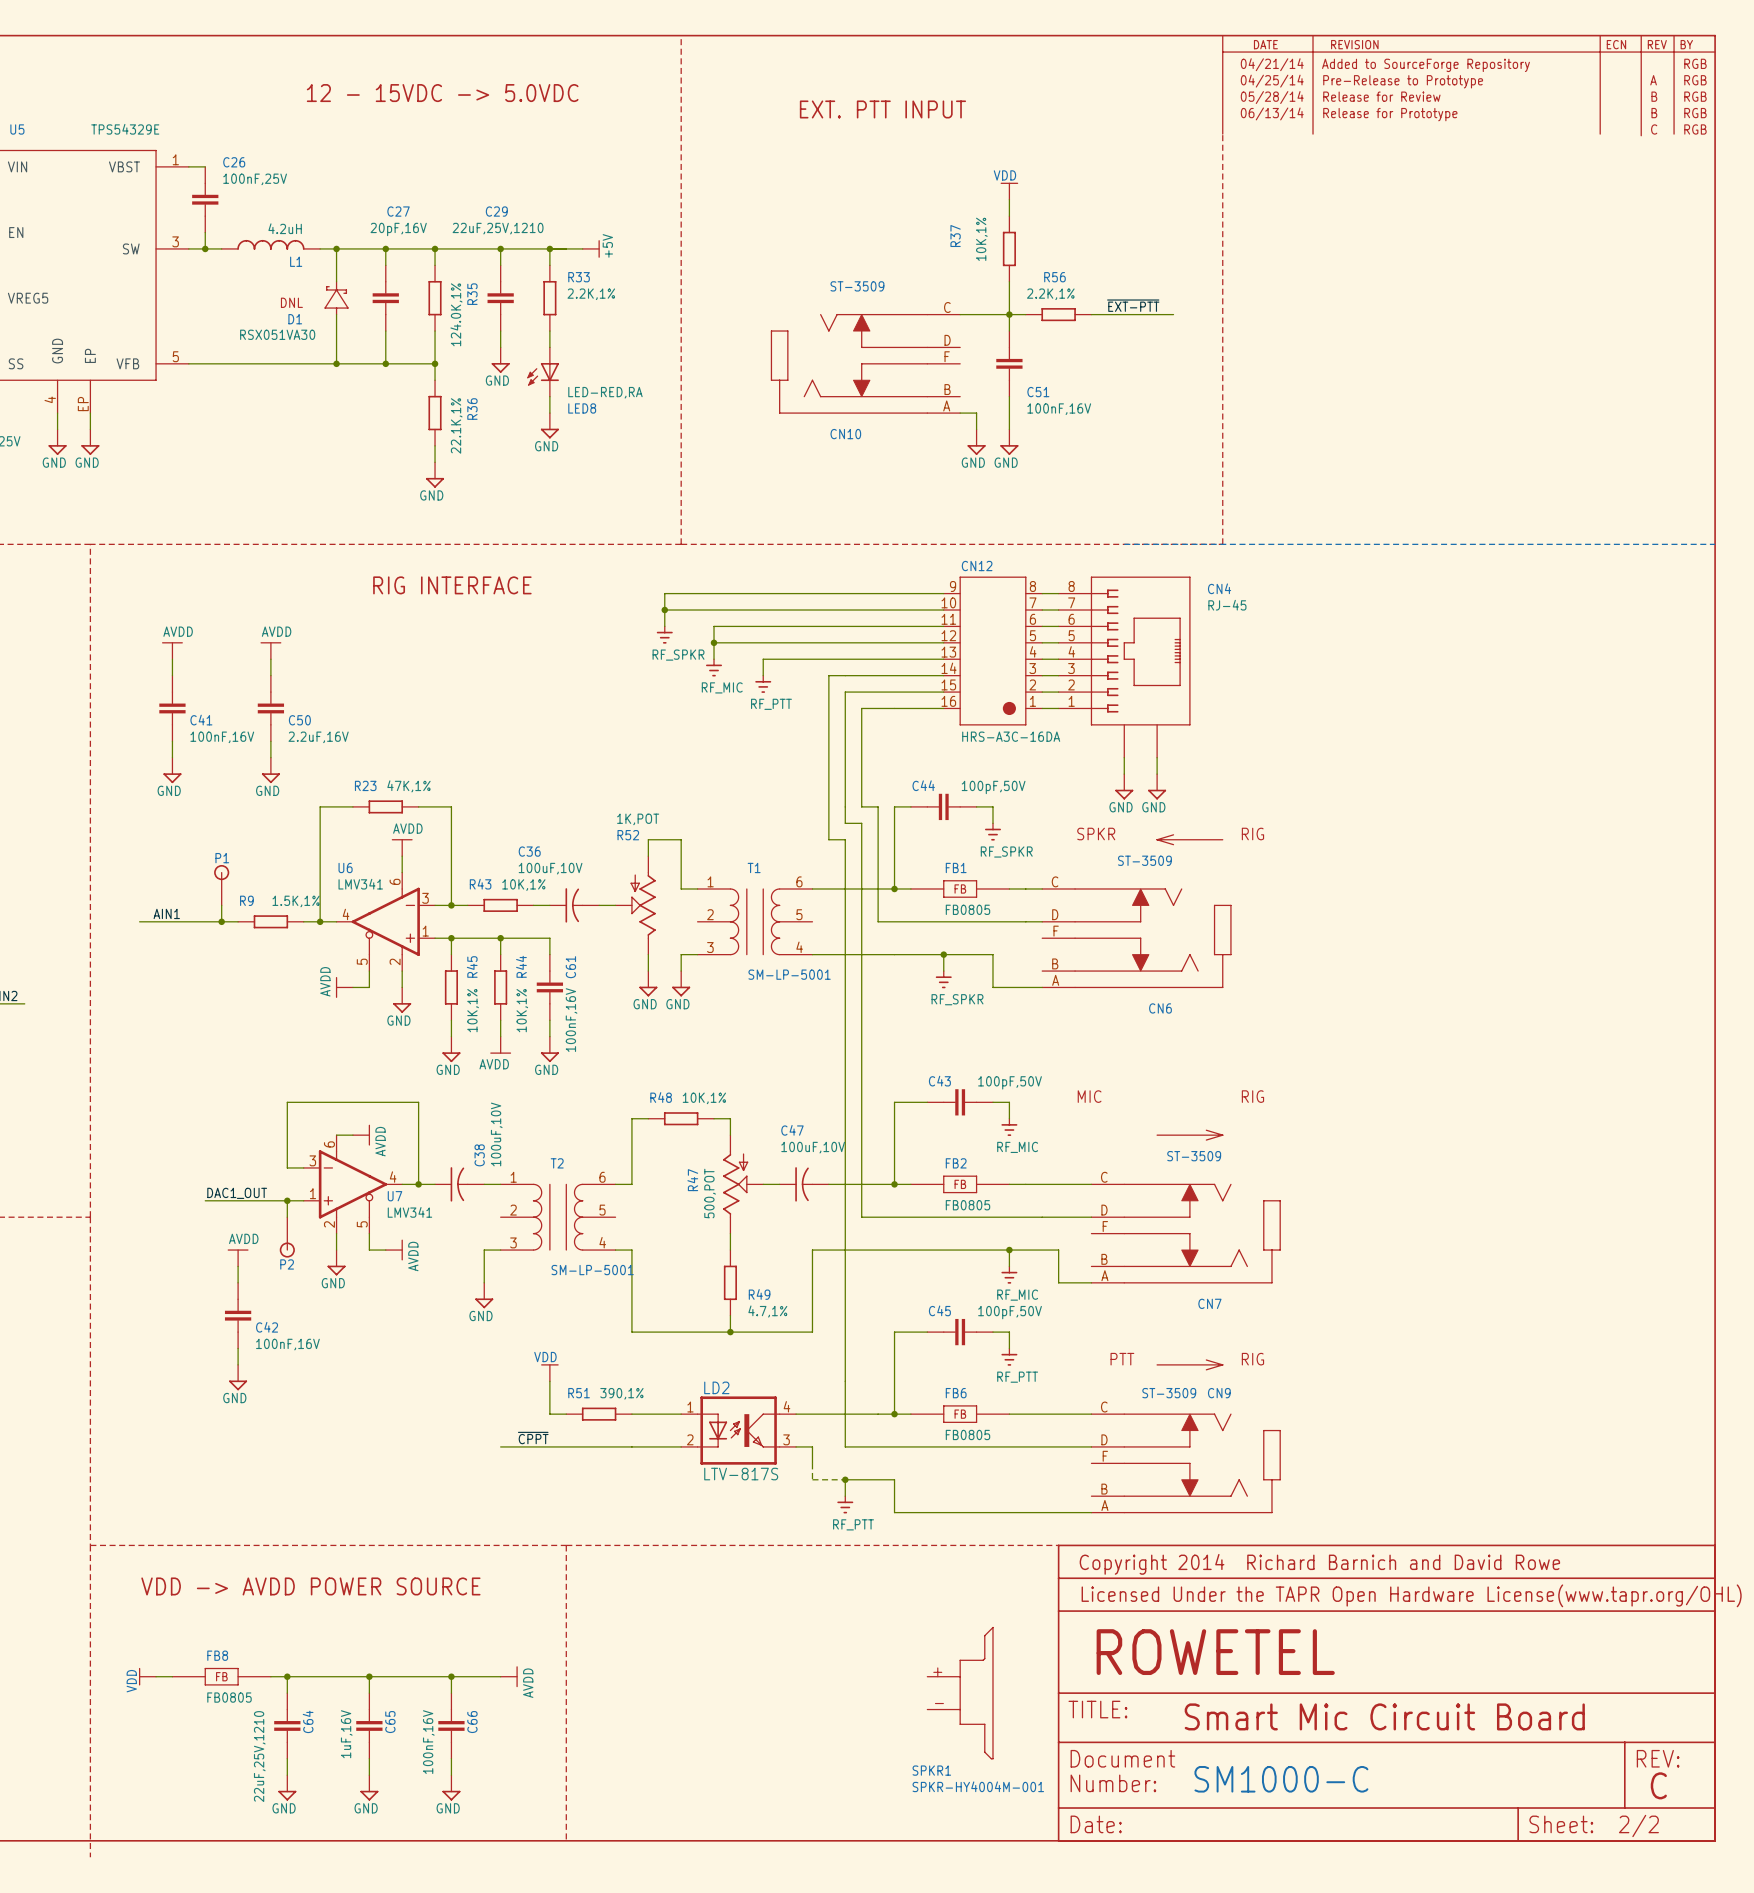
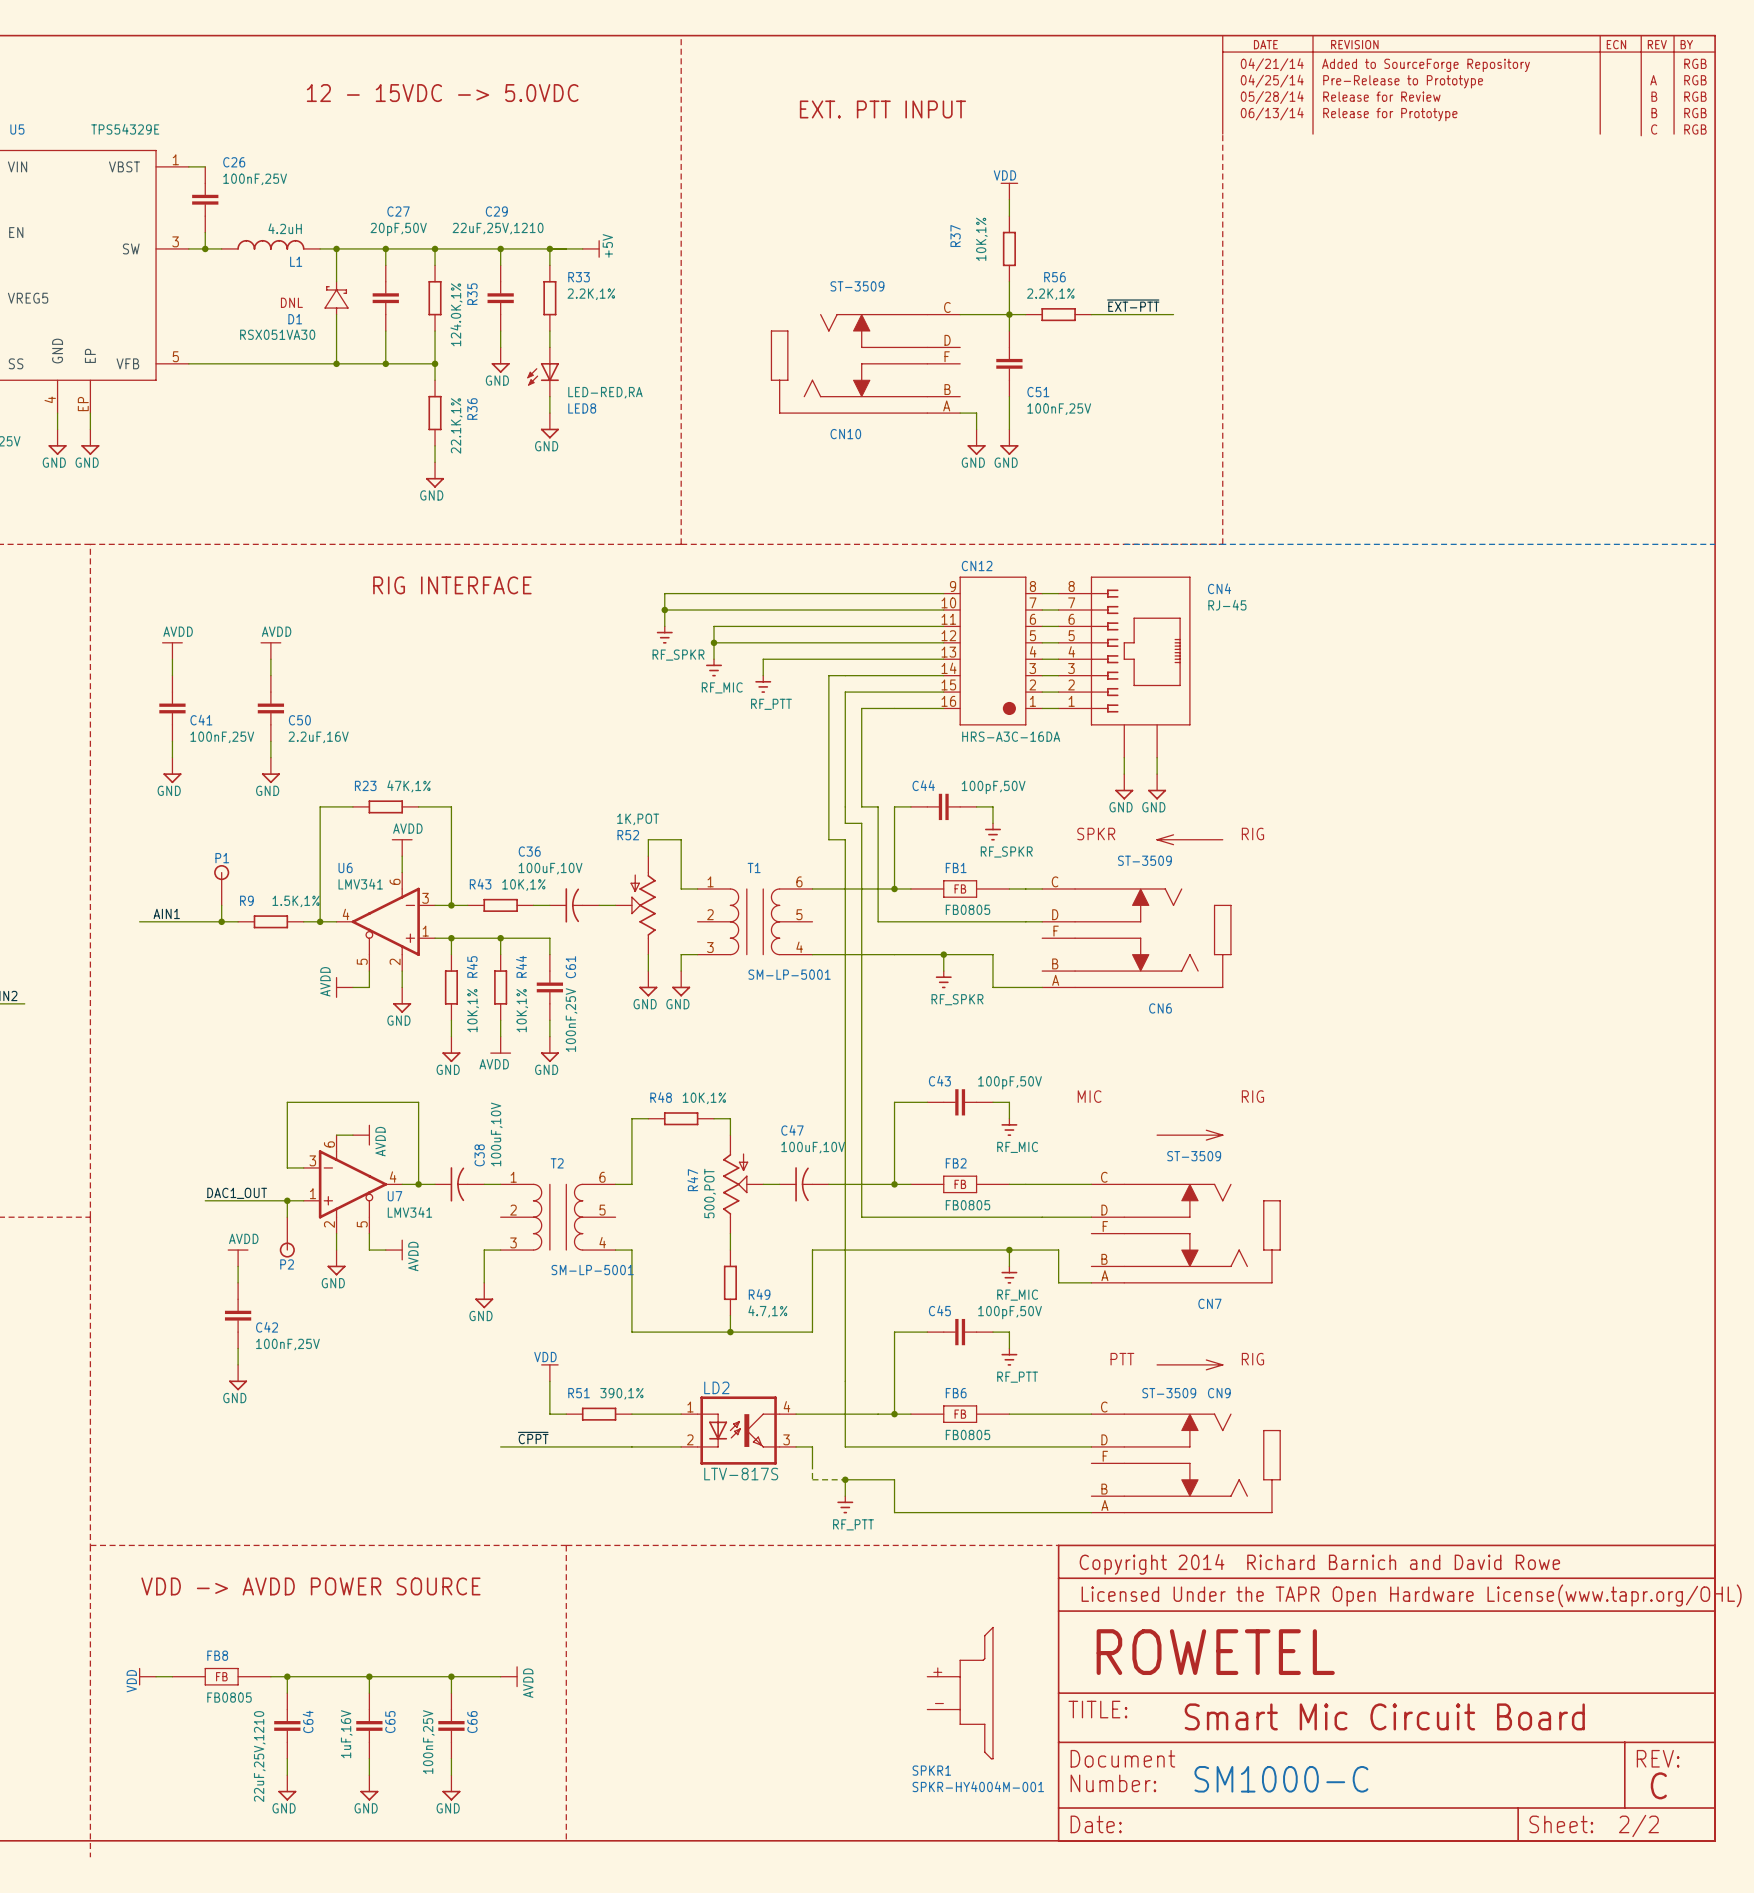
C27 value: 20pF,16V (398, 229) -> 20pF,50V (398, 229)
C51 value: 100nF,16V (1059, 409) -> 100nF,25V (1059, 409)
C41 value: 100nF,16V (222, 737) -> 100nF,25V (222, 737)
C61 value: 100nF,16V (571, 1020) -> 100nF,25V (571, 1020)
C42 value: 100nF,16V (287, 1344) -> 100nF,25V (287, 1344)
C66 value: 100nF,16V (428, 1742) -> 100nF,25V (428, 1742)

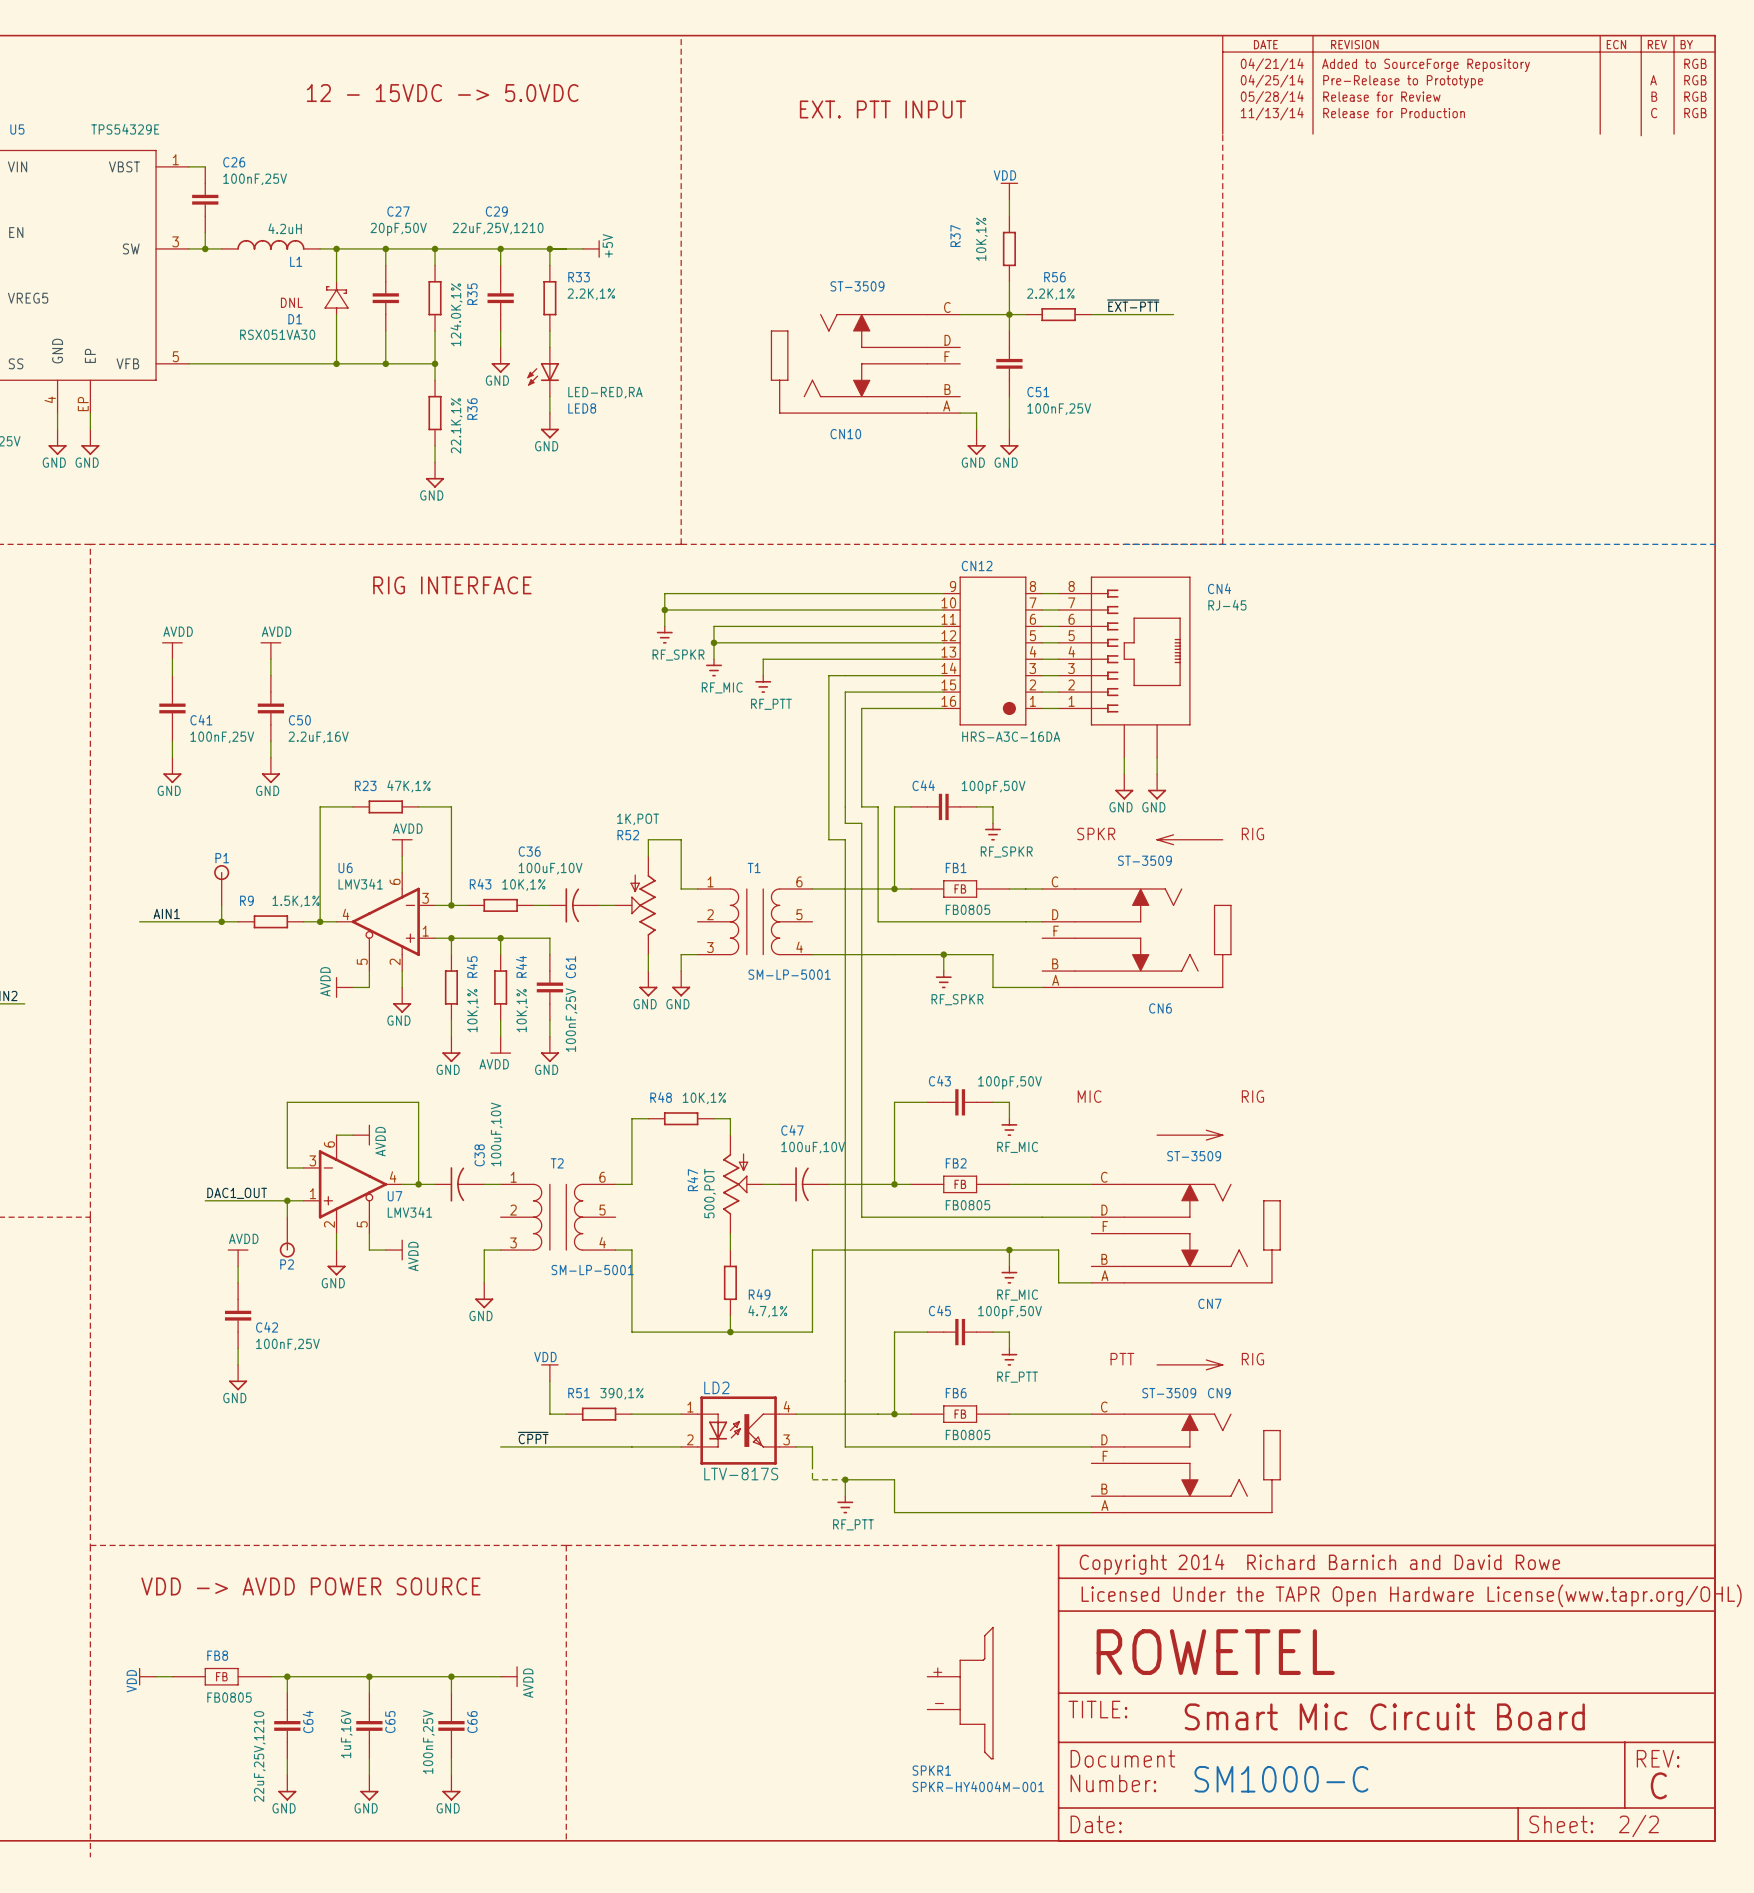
text: 06/13/14 (1272, 113) -> 11/13/14 (1272, 113)
text: B (1654, 113) -> C (1654, 113)
text: Release for Prototype (1390, 114) -> Release for Production (1394, 113)
text: C (1654, 129) -> none
text: RGB (1695, 129) -> none

